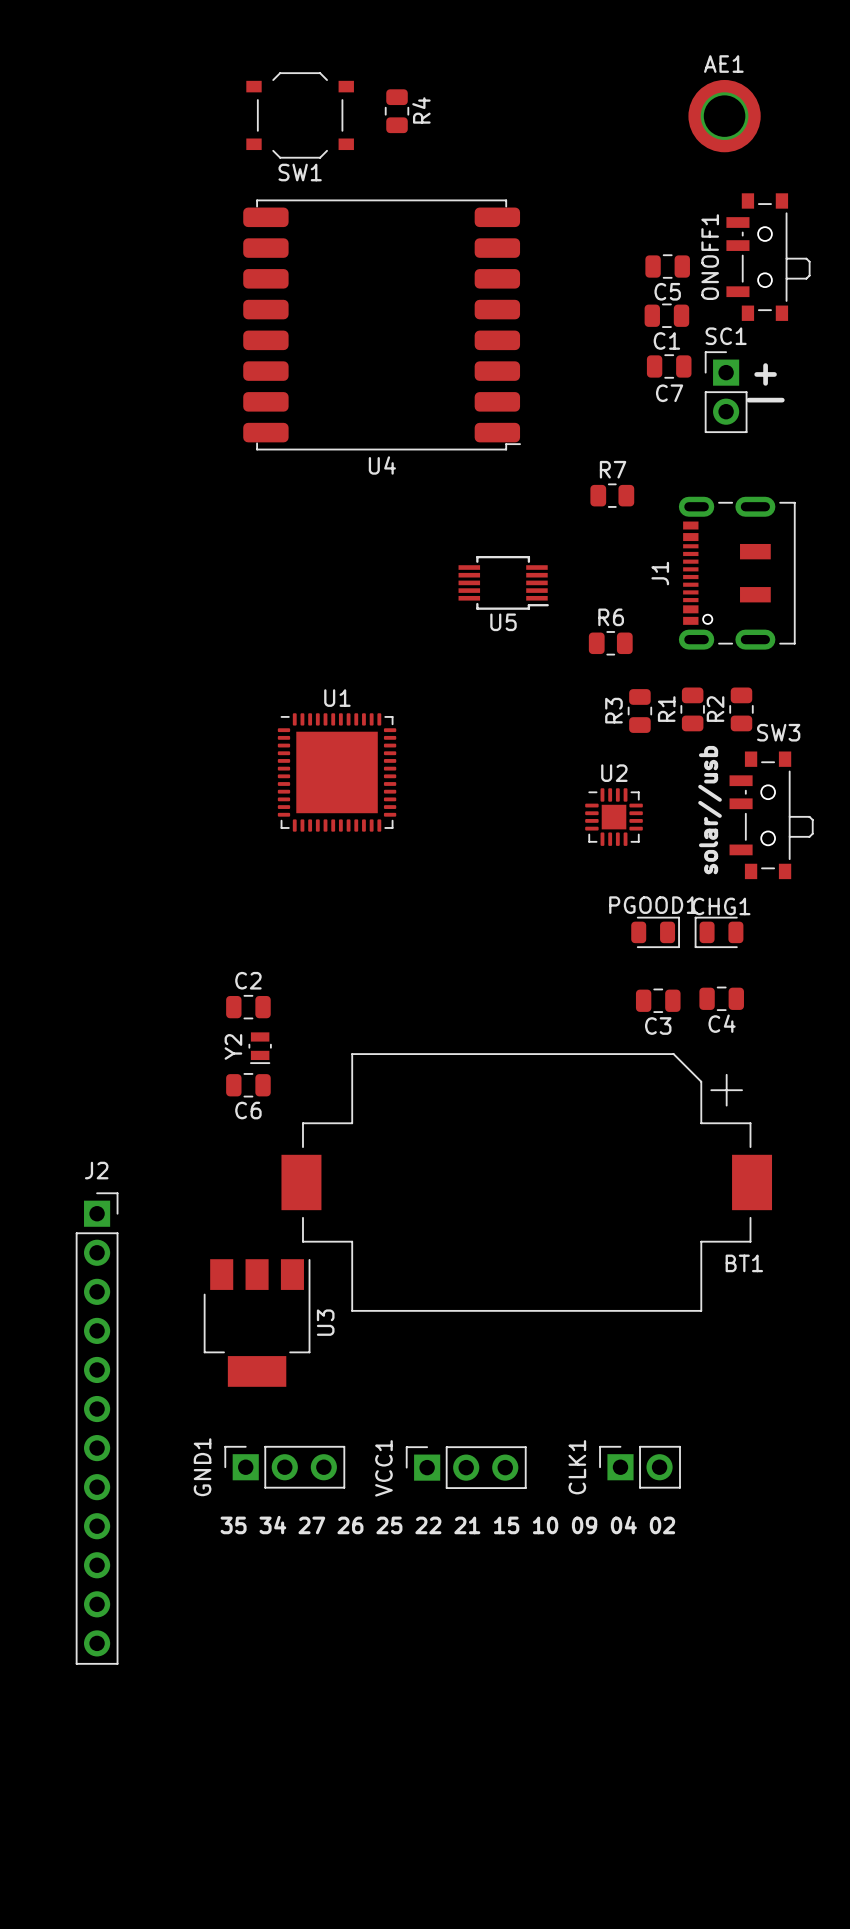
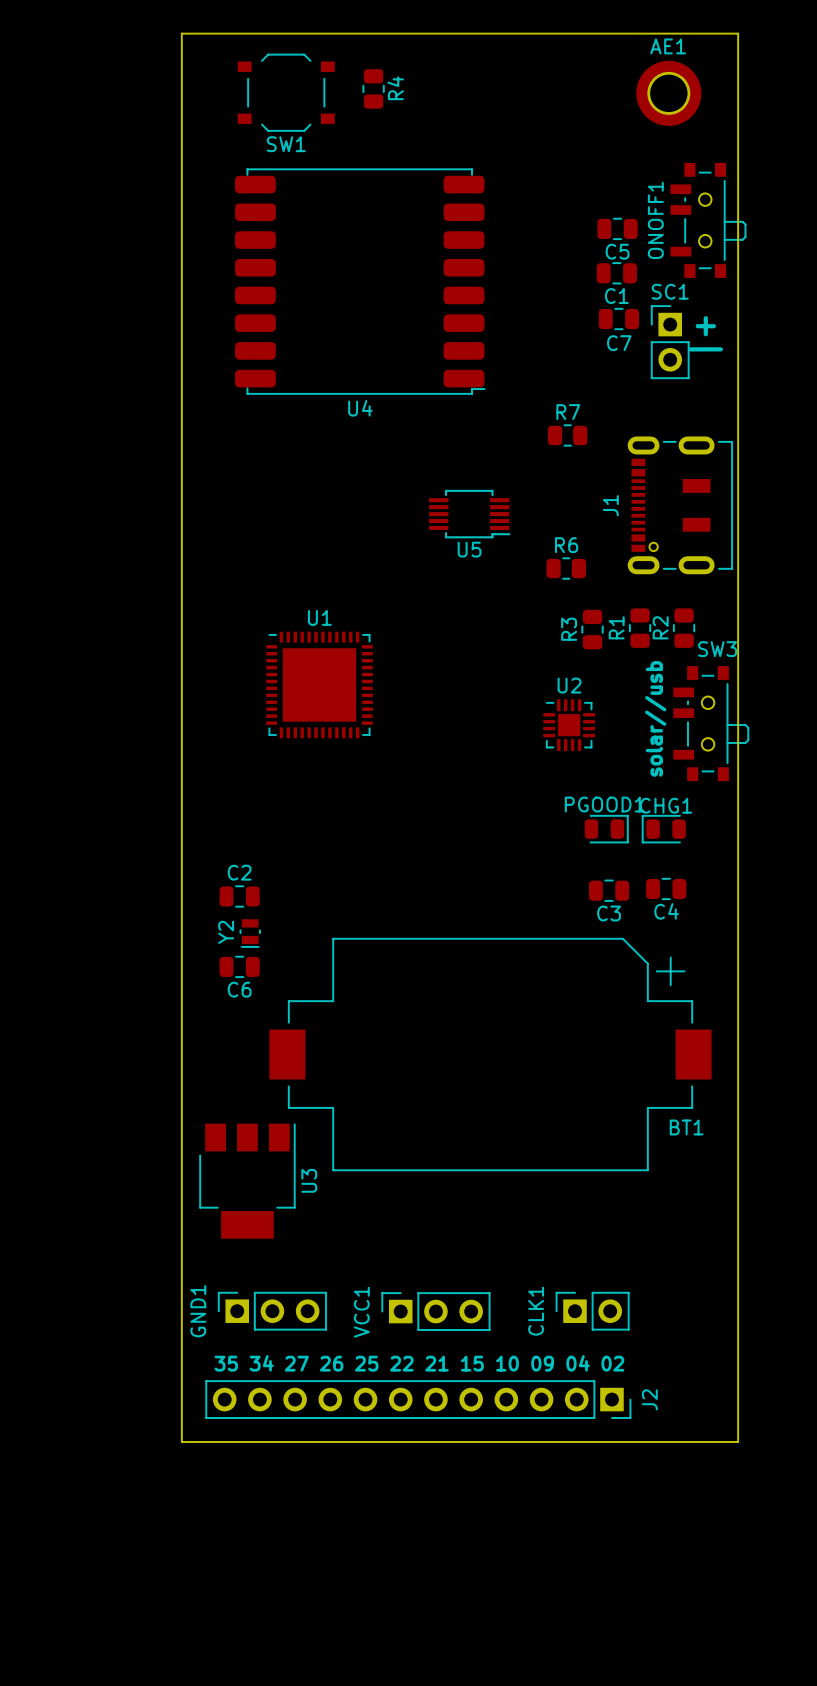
board edge: none -> (181, 33) (738, 33) (738, 1441) (181, 1441) (181, 33)
J2 rotation: 0° (97, 1428) -> 90° clockwise (418, 1399)
J2 position: (97, 1428) -> (418, 1399)

